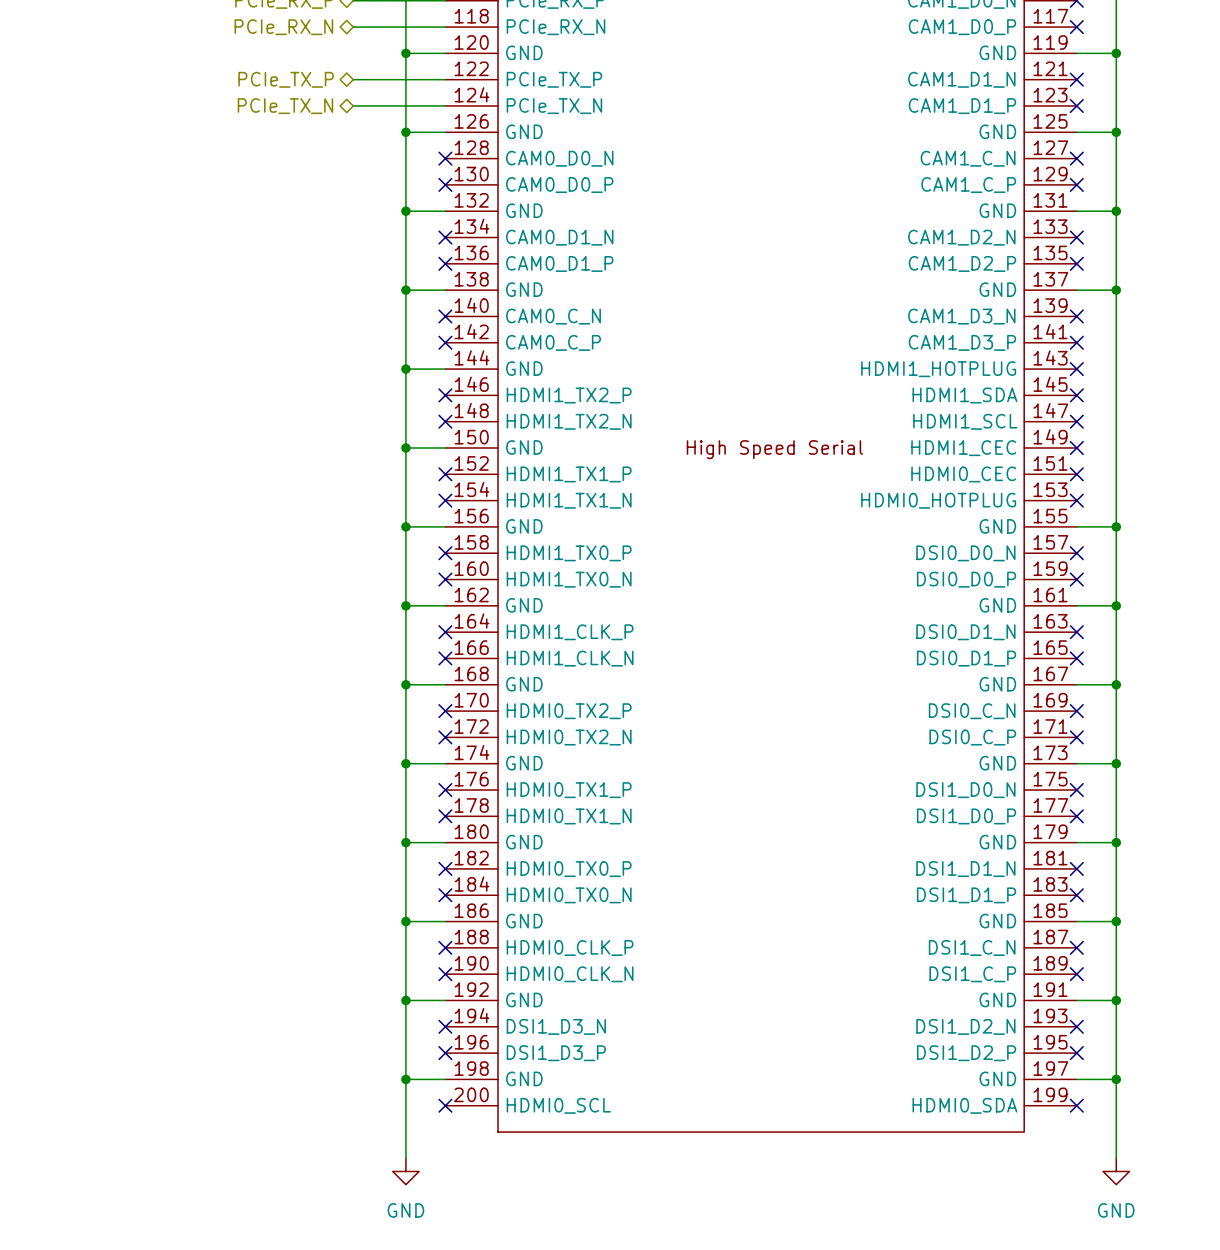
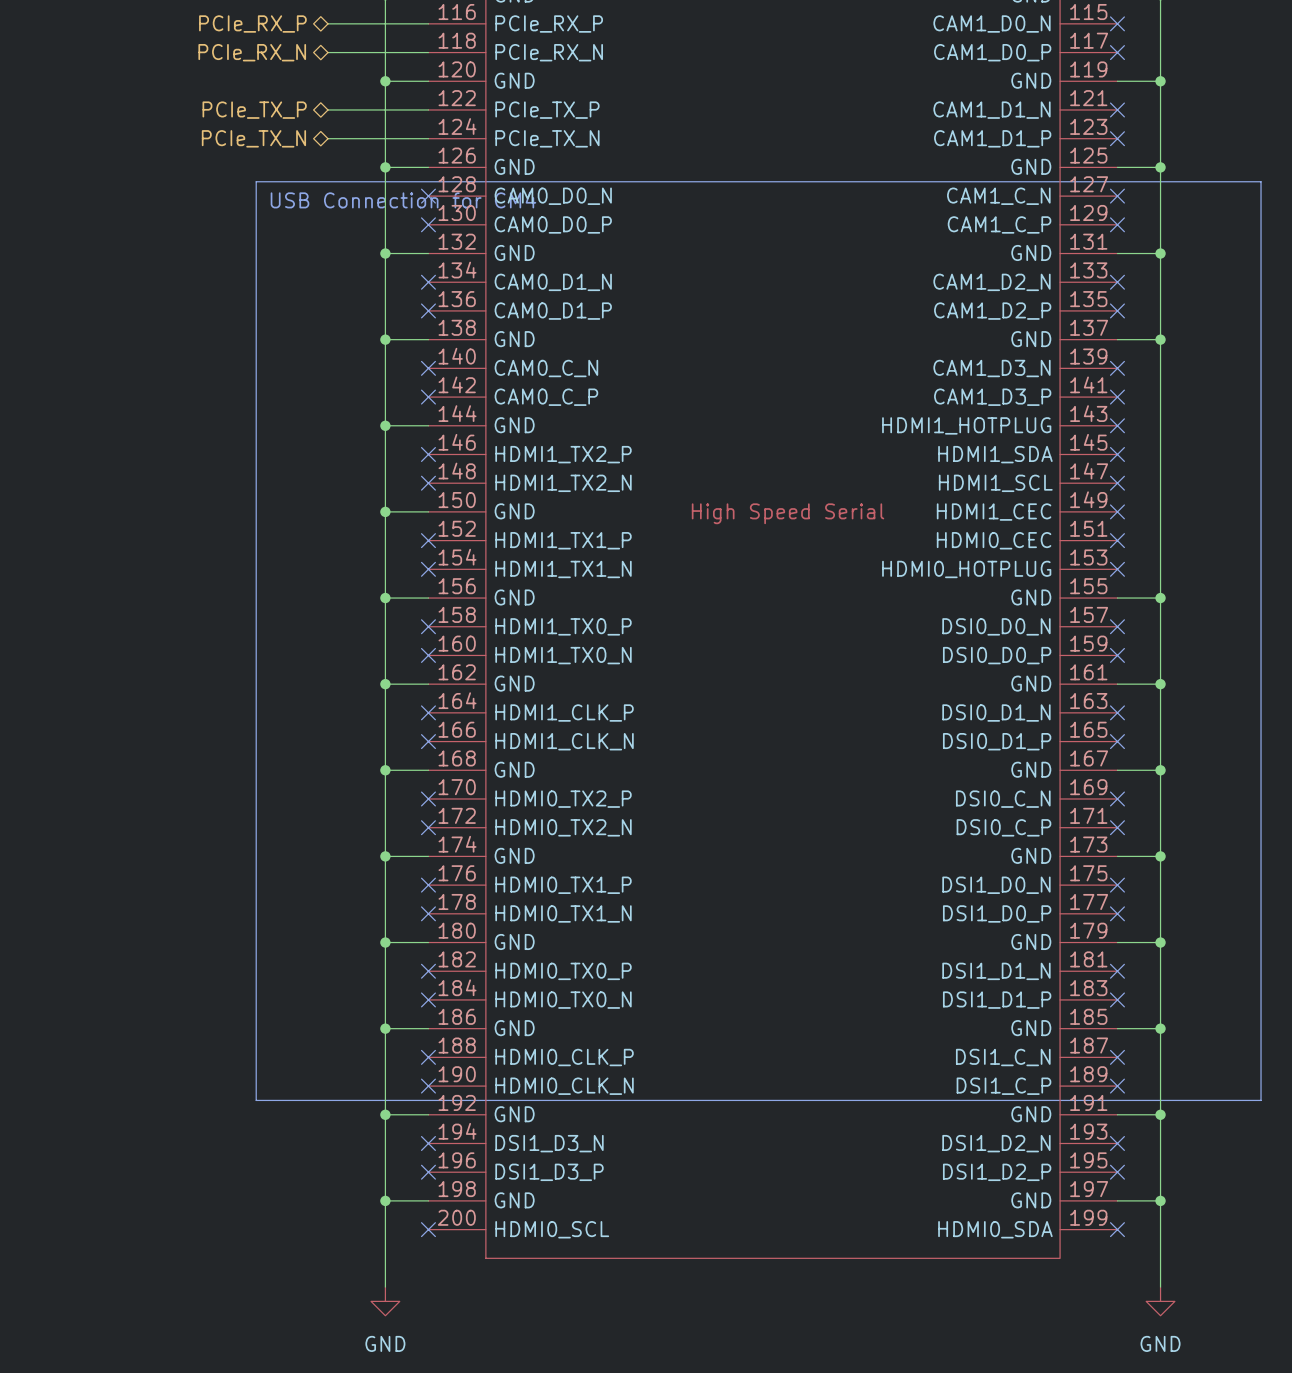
line: none -> (256, 181) (1261, 181) (1261, 1100) (256, 1100) (256, 181)
text: none -> USB Connection for CM4 (403, 200)

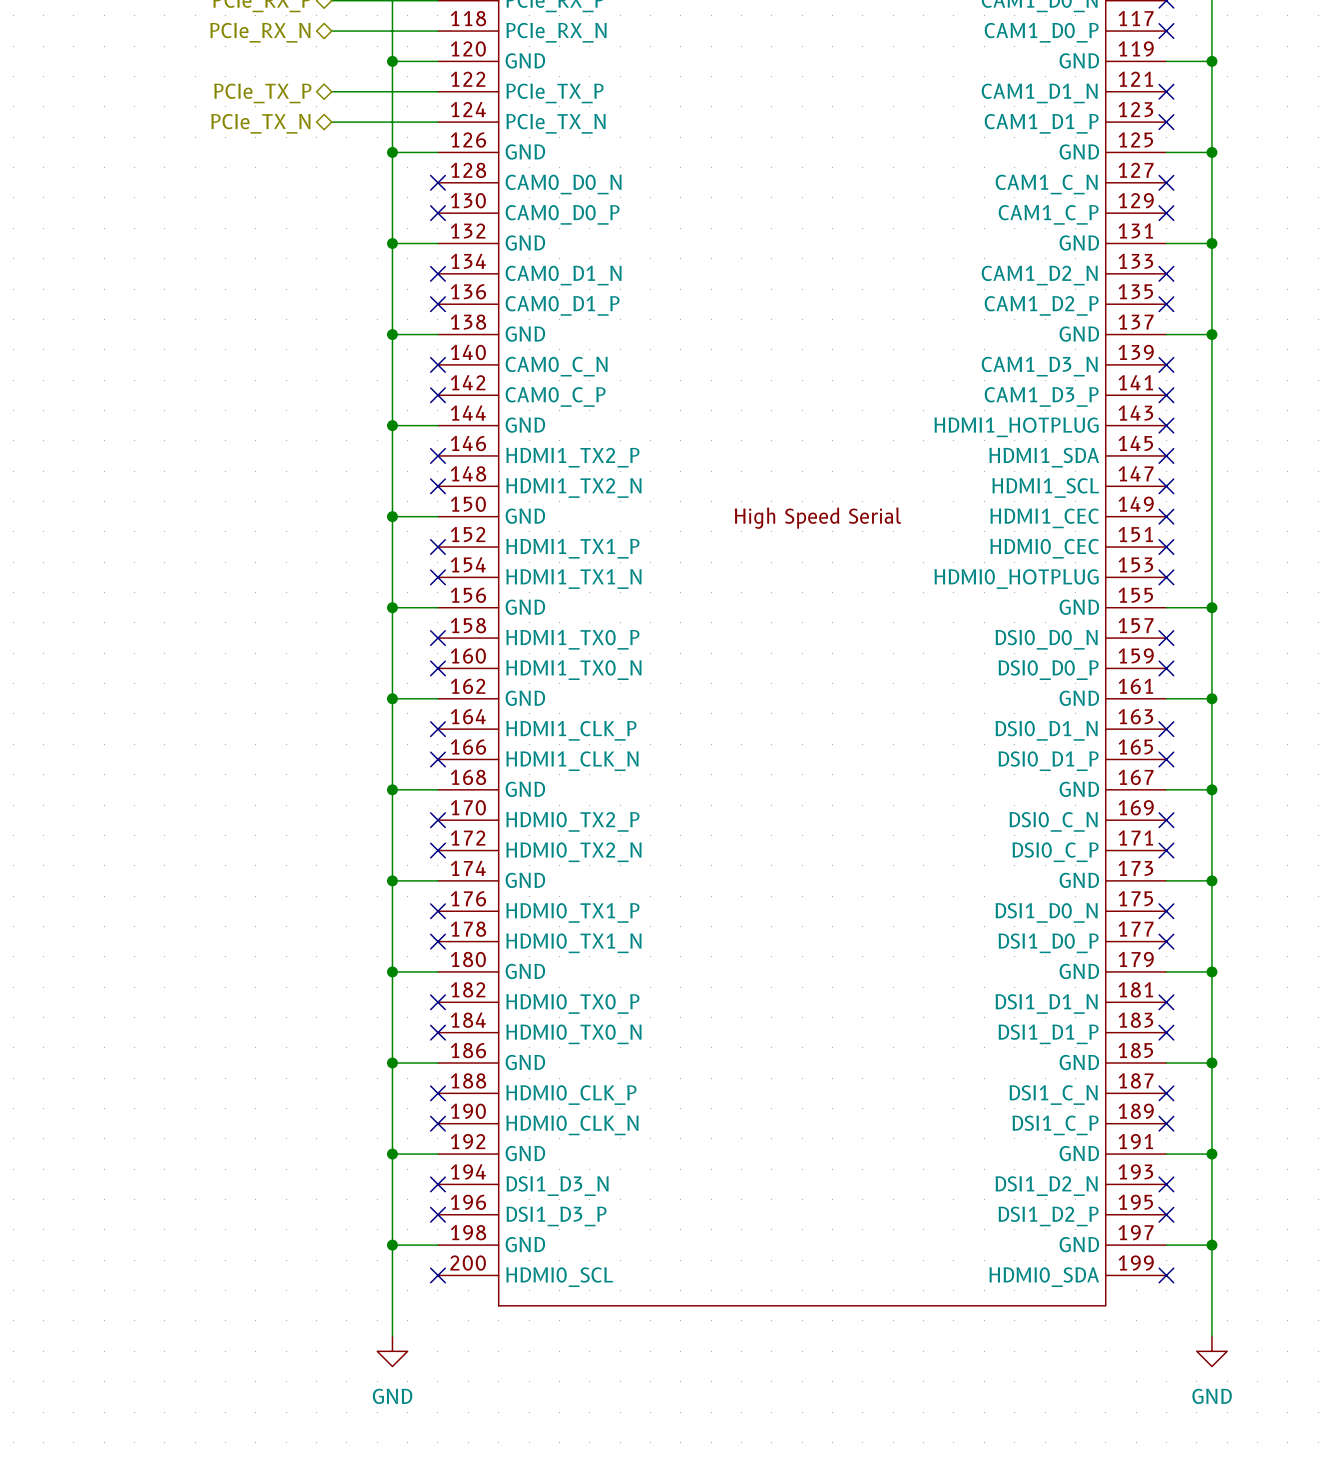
line: (256, 181) (1261, 181) (1261, 1100) (256, 1100) (256, 181) -> none
text: USB Connection for CM4 (403, 200) -> none

